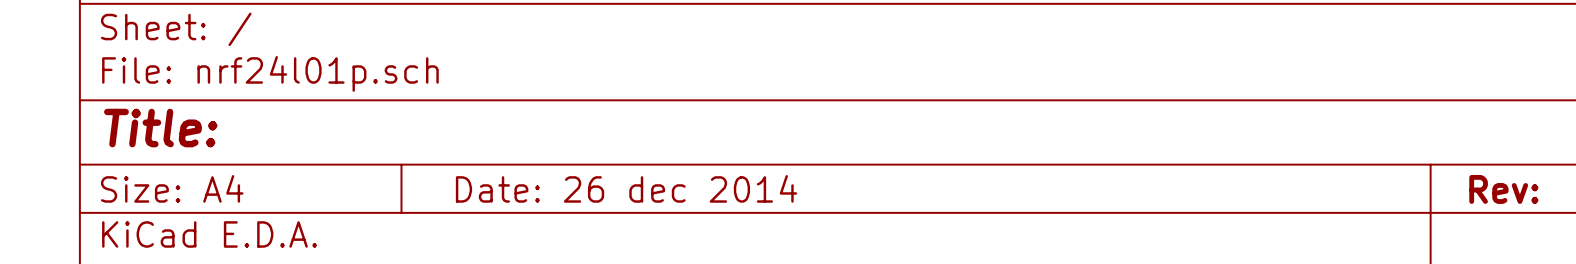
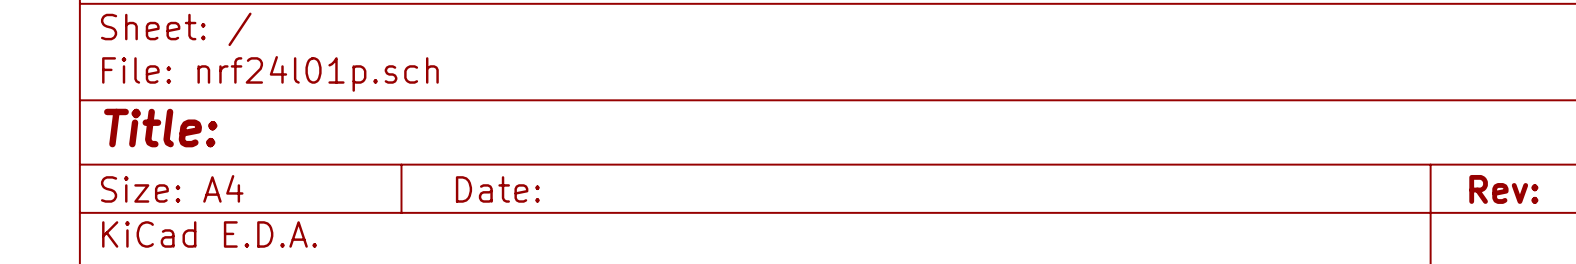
title block: Date: 26 dec 2014 (626, 188) -> Date: (497, 189)

